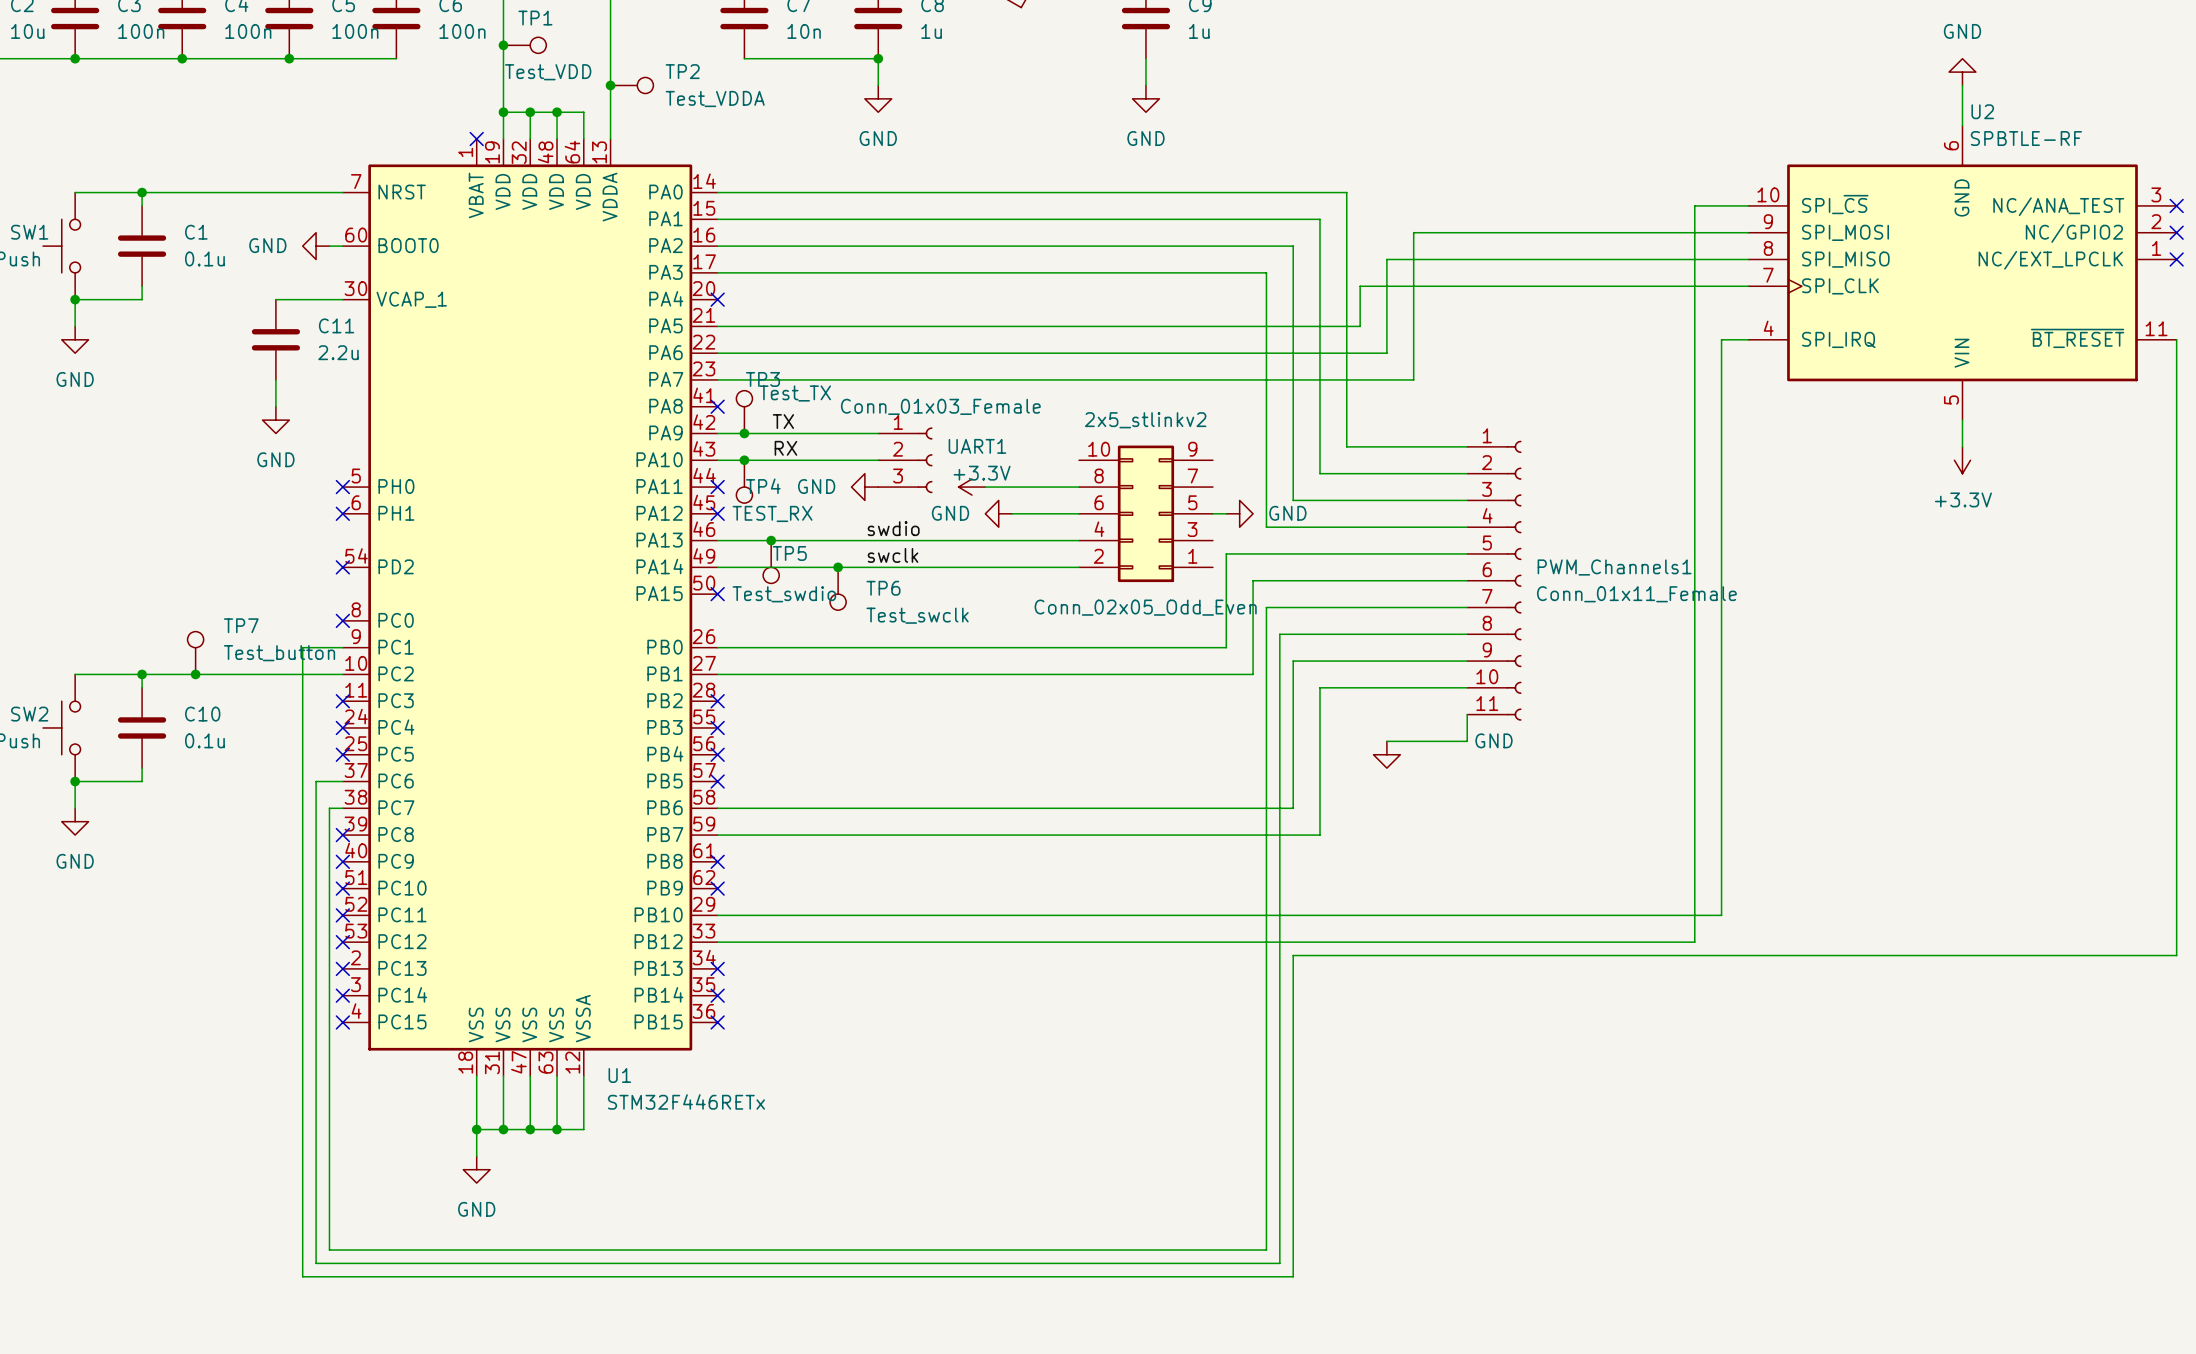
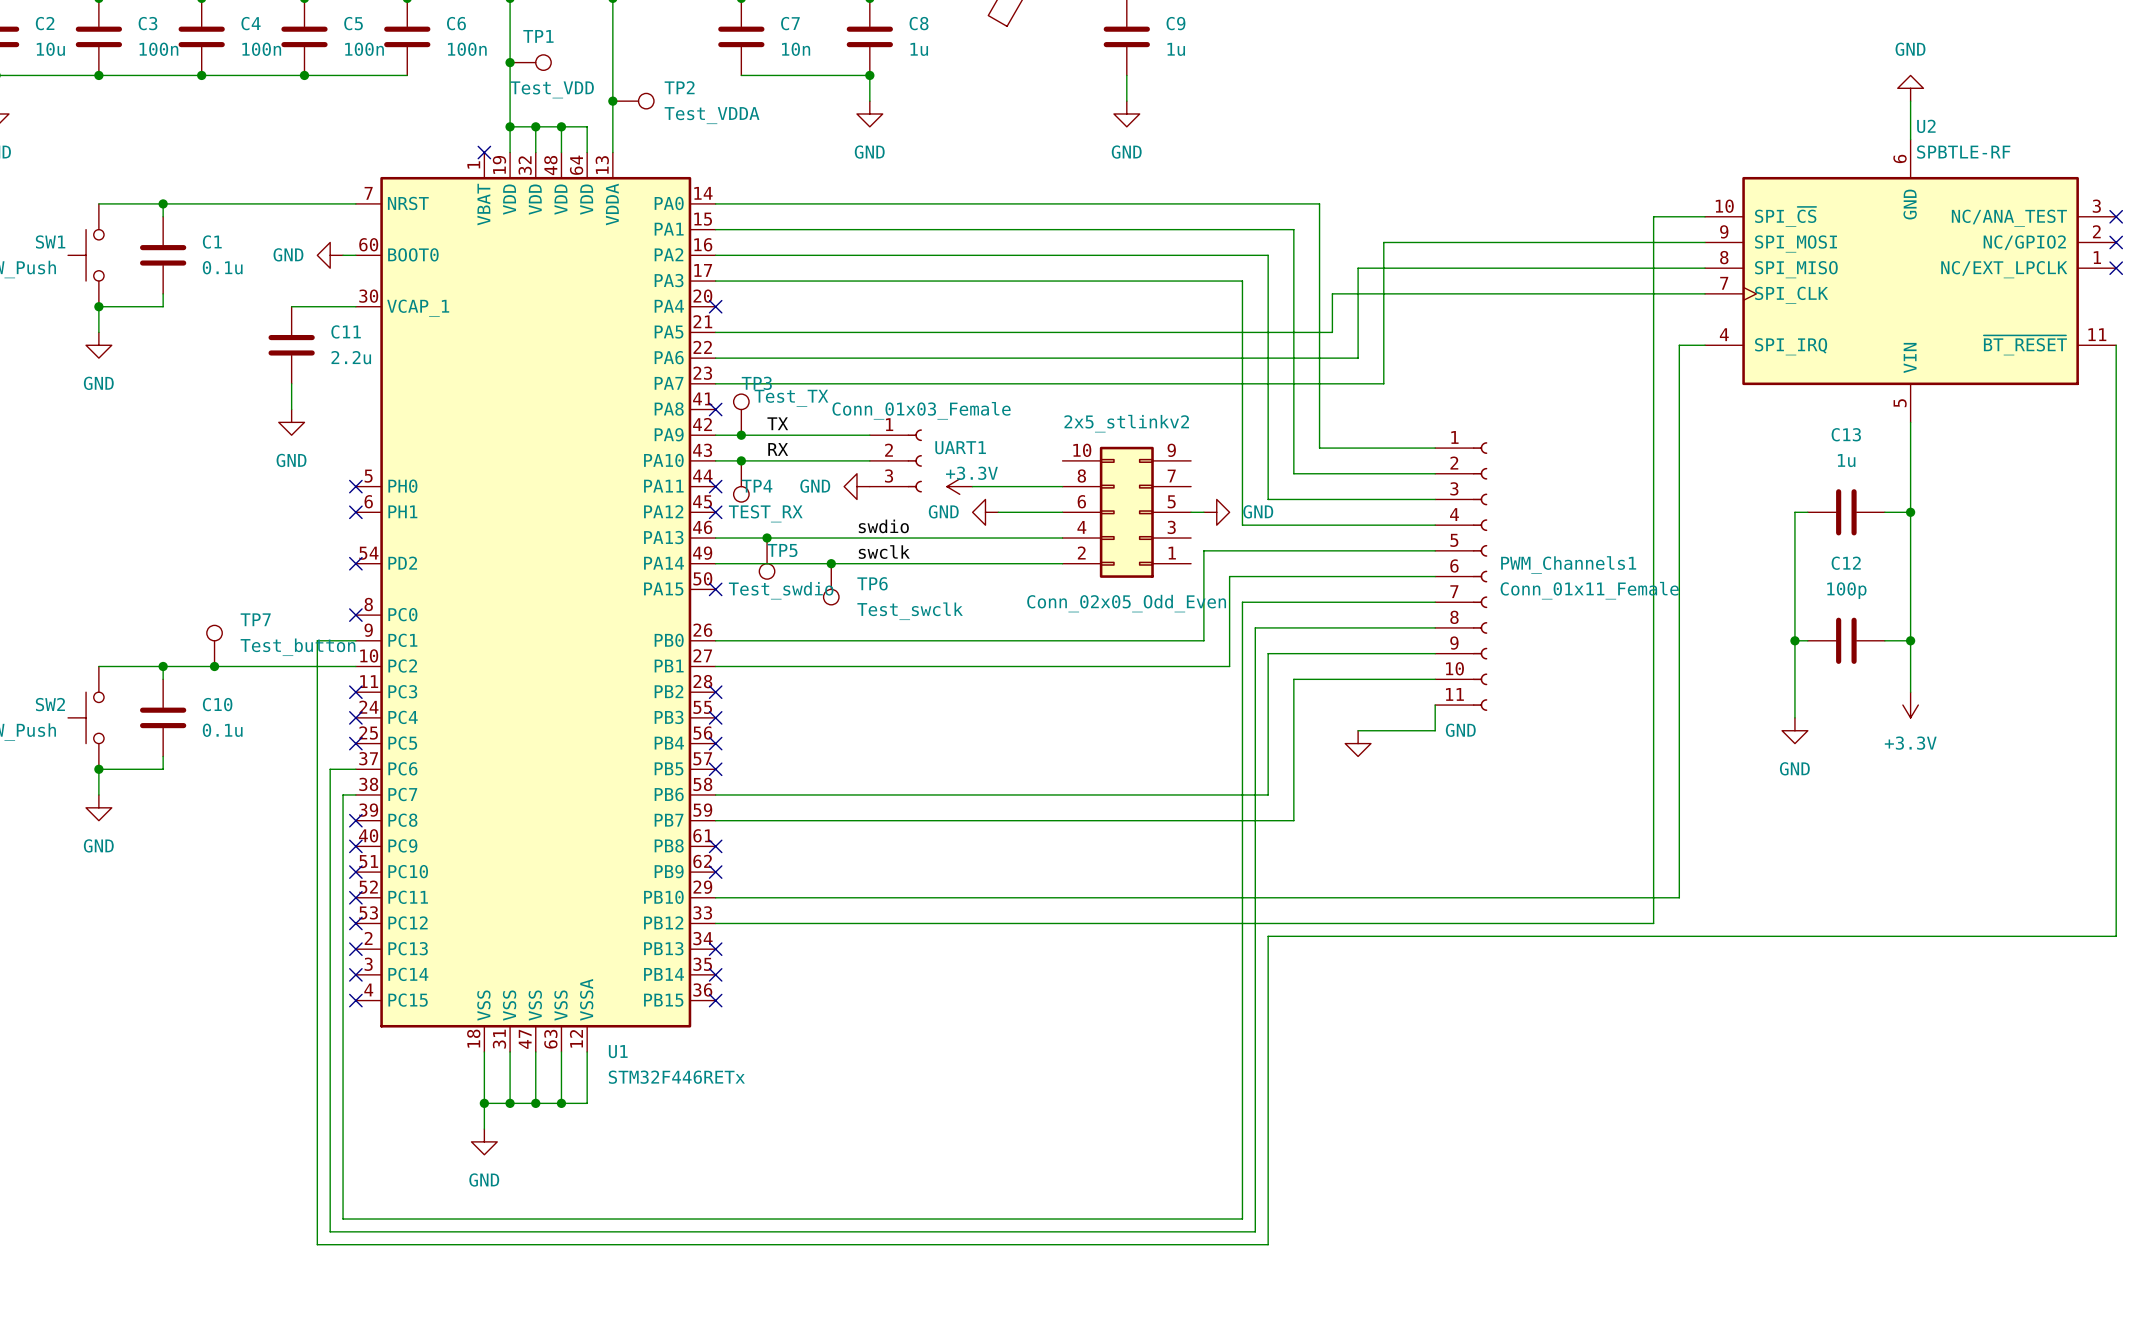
wire: none -> (1910, 448) (1910, 692)
power symbol position: +3.3V (1962, 460) -> +3.3V (1910, 705)
wire: none -> (1807, 512) (1794, 512) (1794, 717)
C13: none -> 1u (1846, 512)
wire: none -> (1884, 512) (1910, 512)
junction: none -> (1910, 512)
wire: none -> (1794, 640) (1807, 640)
junction: none -> (1794, 640)
C12: none -> 100p (1846, 640)
wire: none -> (1884, 640) (1910, 640)
junction: none -> (1910, 640)
power symbol: none -> GND (1794, 730)

